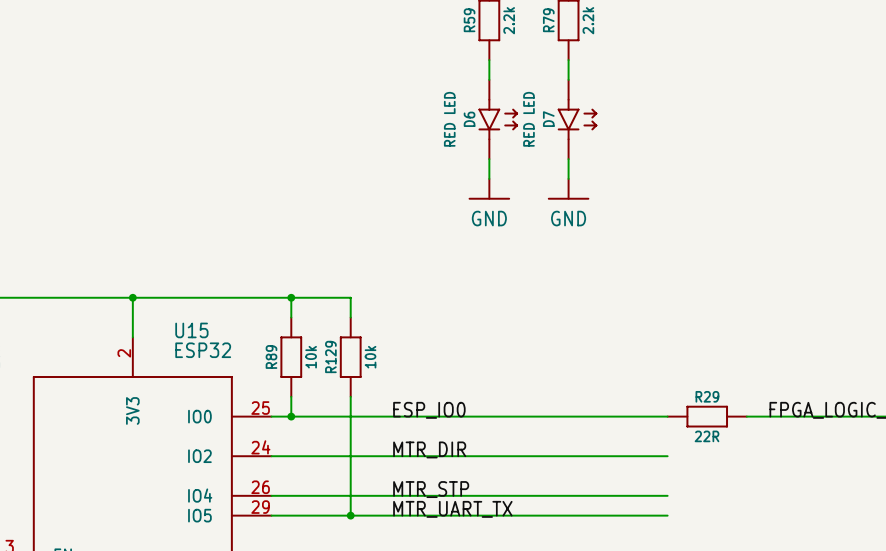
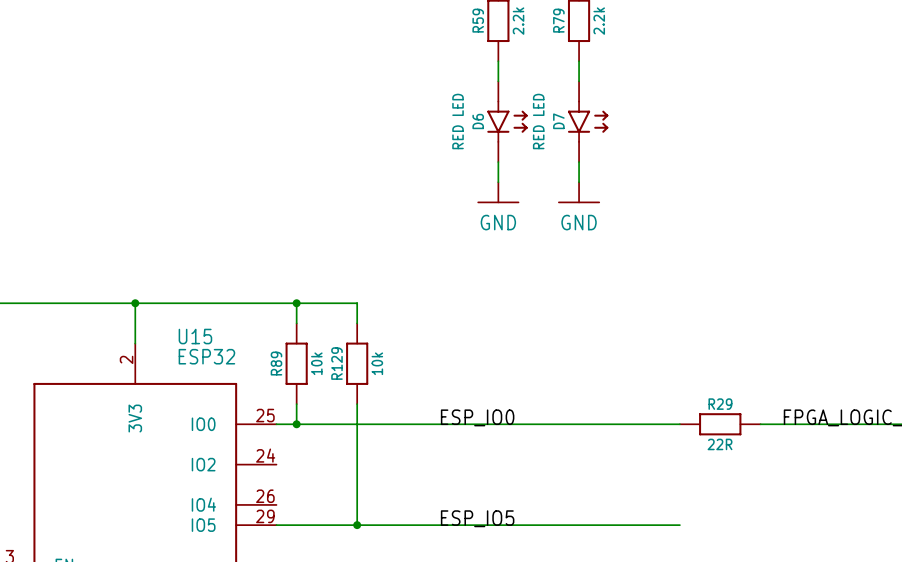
label position: ESP_IO0 (429, 410) -> ESP_IO0 (477, 417)
label: MTR_DIR (429, 449) -> none
wire: (271, 456) (667, 456) -> none
label: MTR_STP (431, 489) -> none
wire: (271, 495) (667, 495) -> none
label: MTR_UART_TX (452, 509) -> none
label: none -> ESP_IO5 (477, 518)

